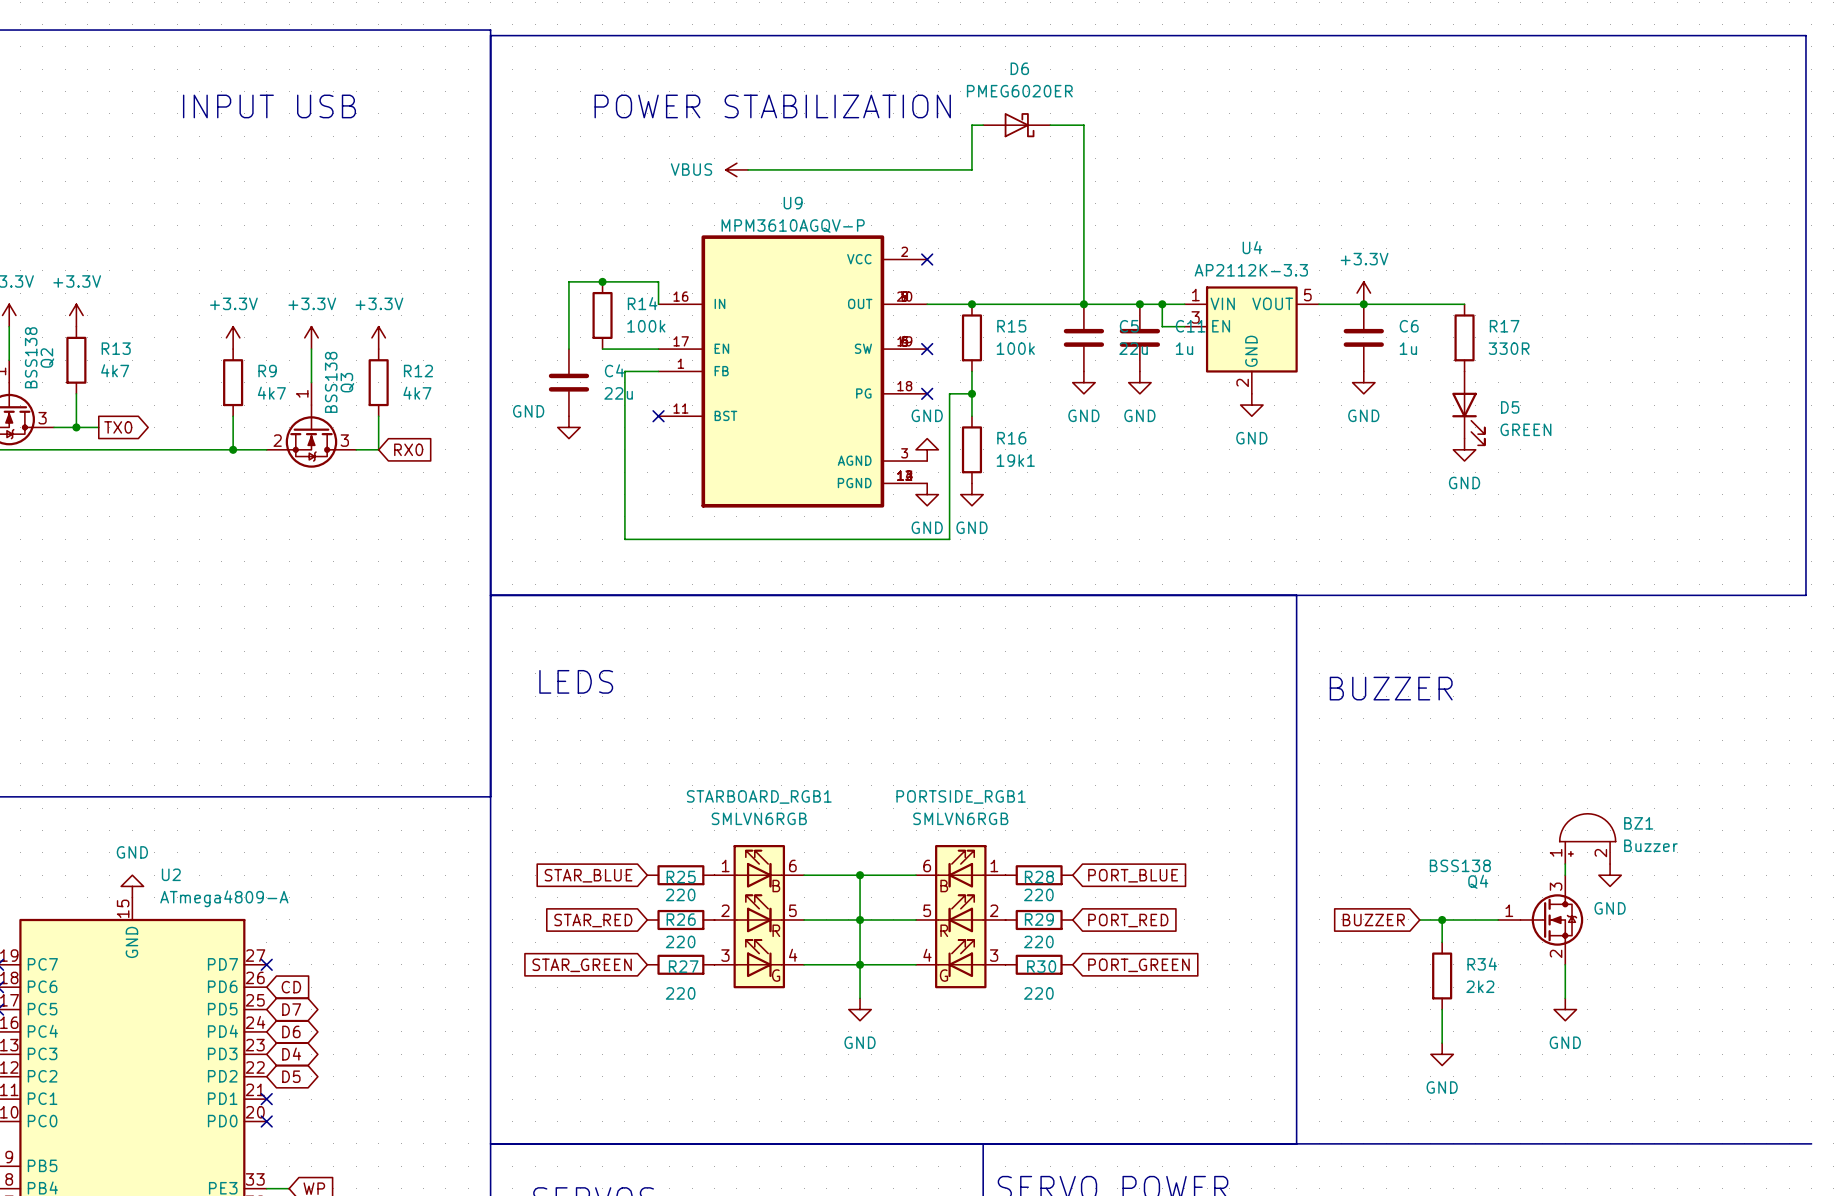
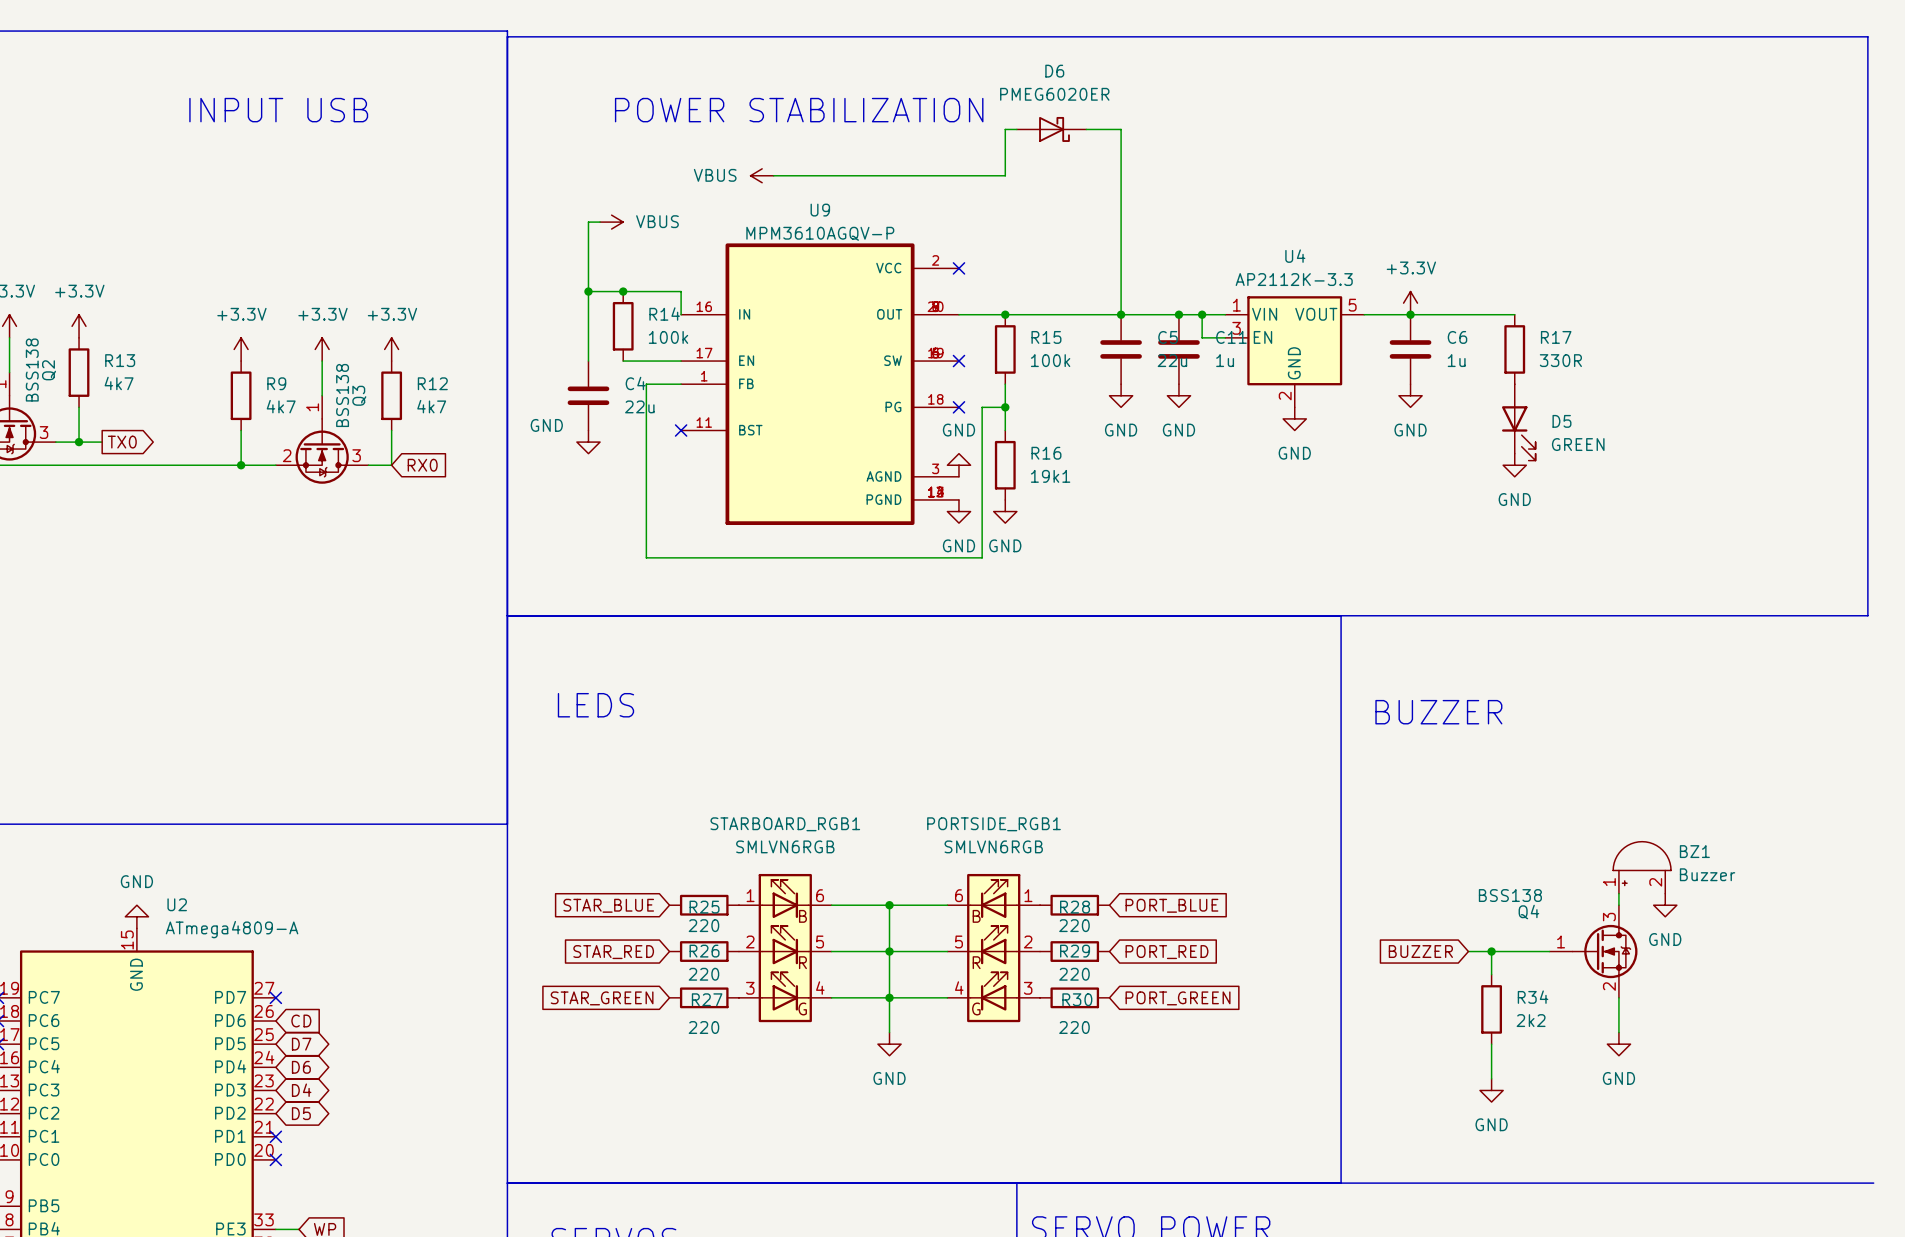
wire: none -> (600, 222) (588, 222) (588, 291)
power symbol: none -> VBUS (611, 222)
junction: none -> (588, 291)

